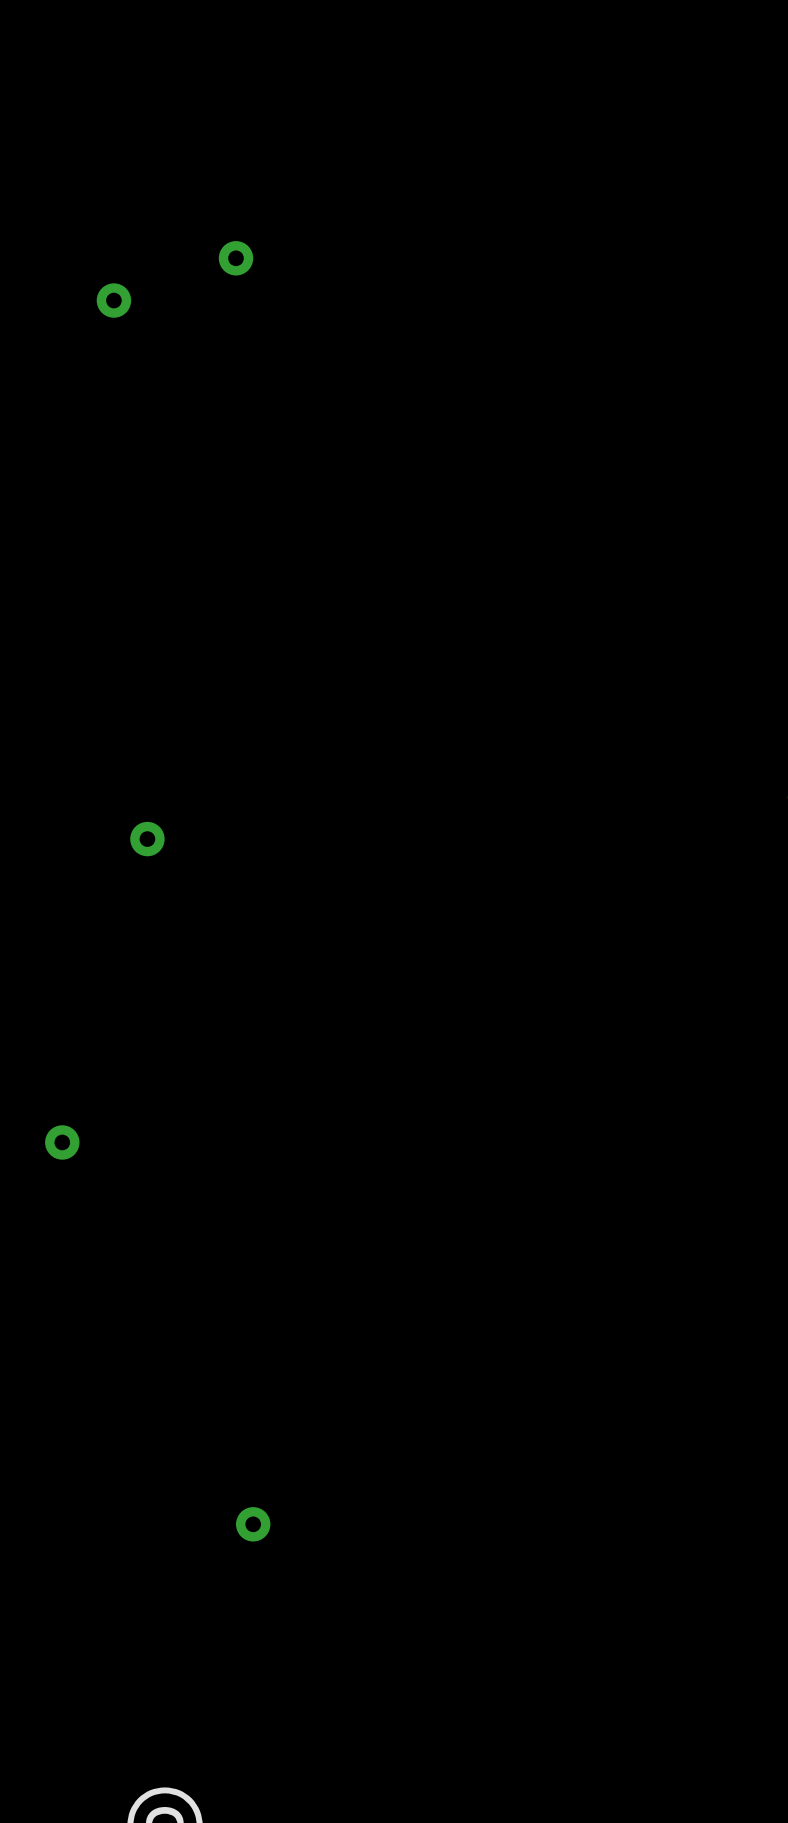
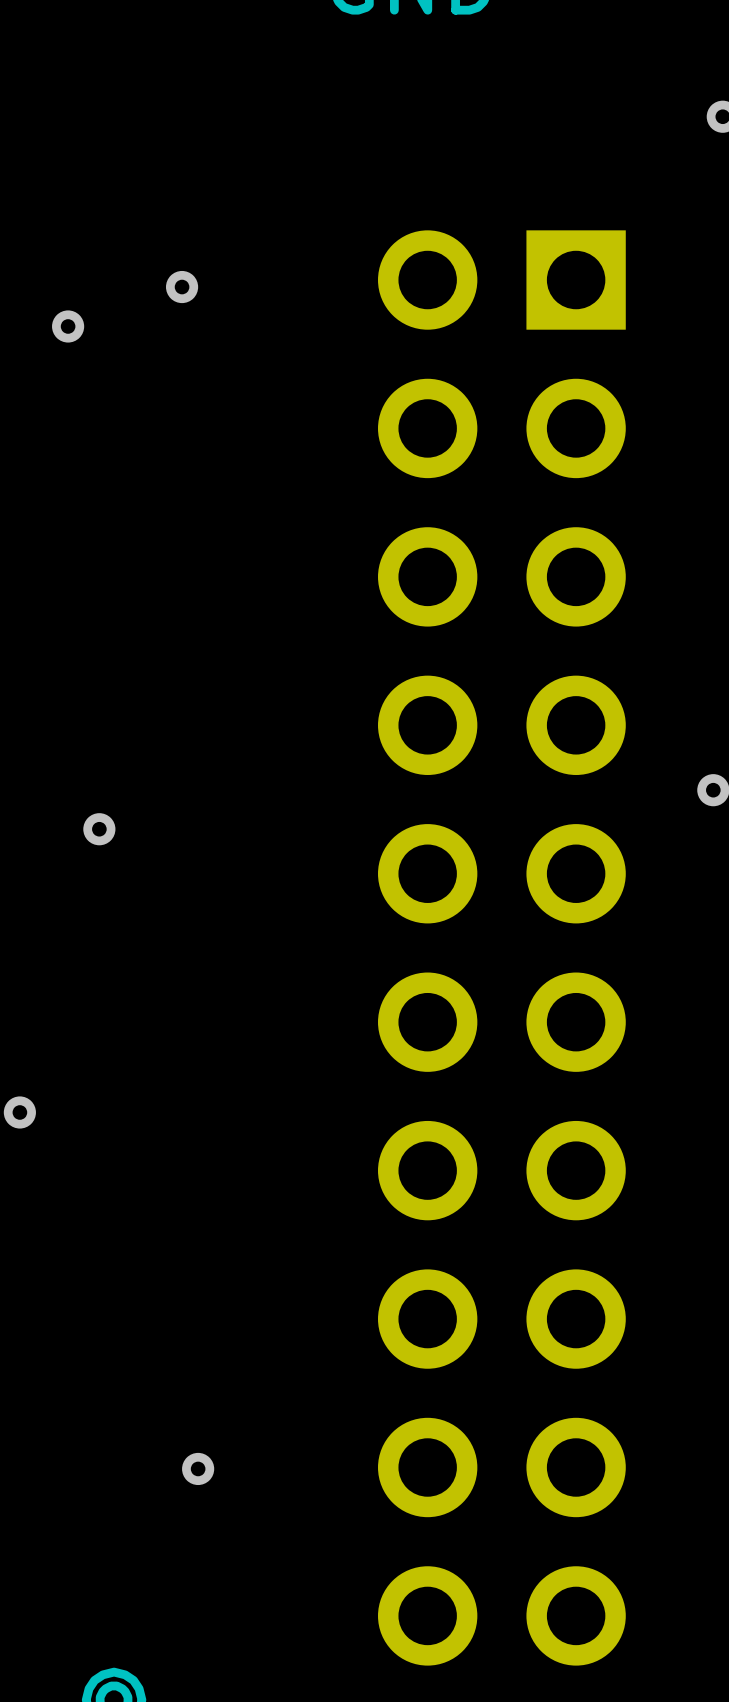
part: none -> (501, 947)

